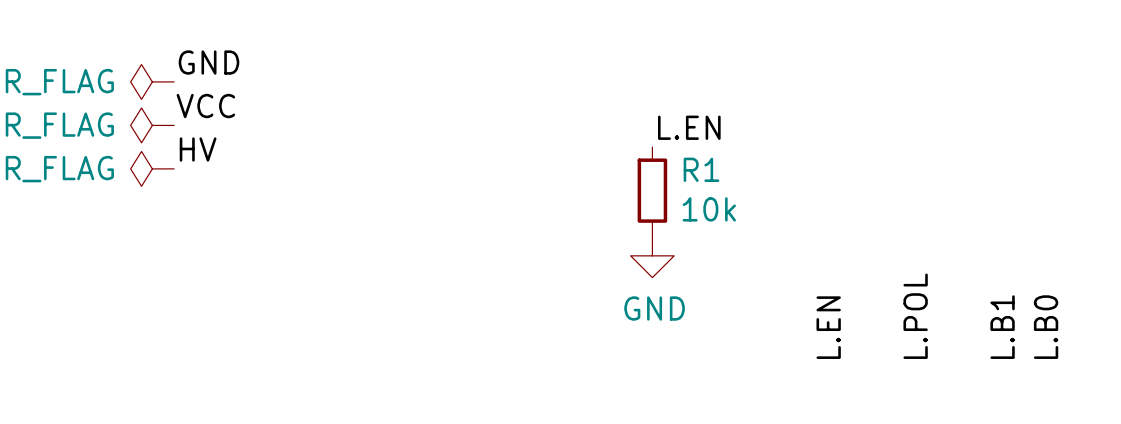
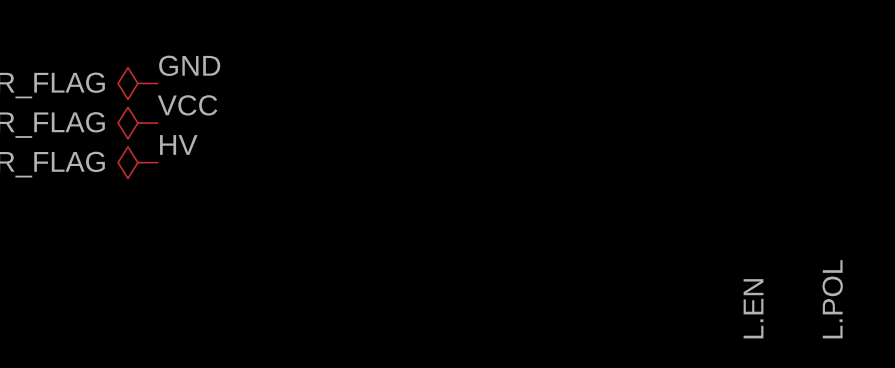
label: L.EN (689, 127) -> none
R1: 10k (652, 190) -> none
power symbol: GND (652, 255) -> none

